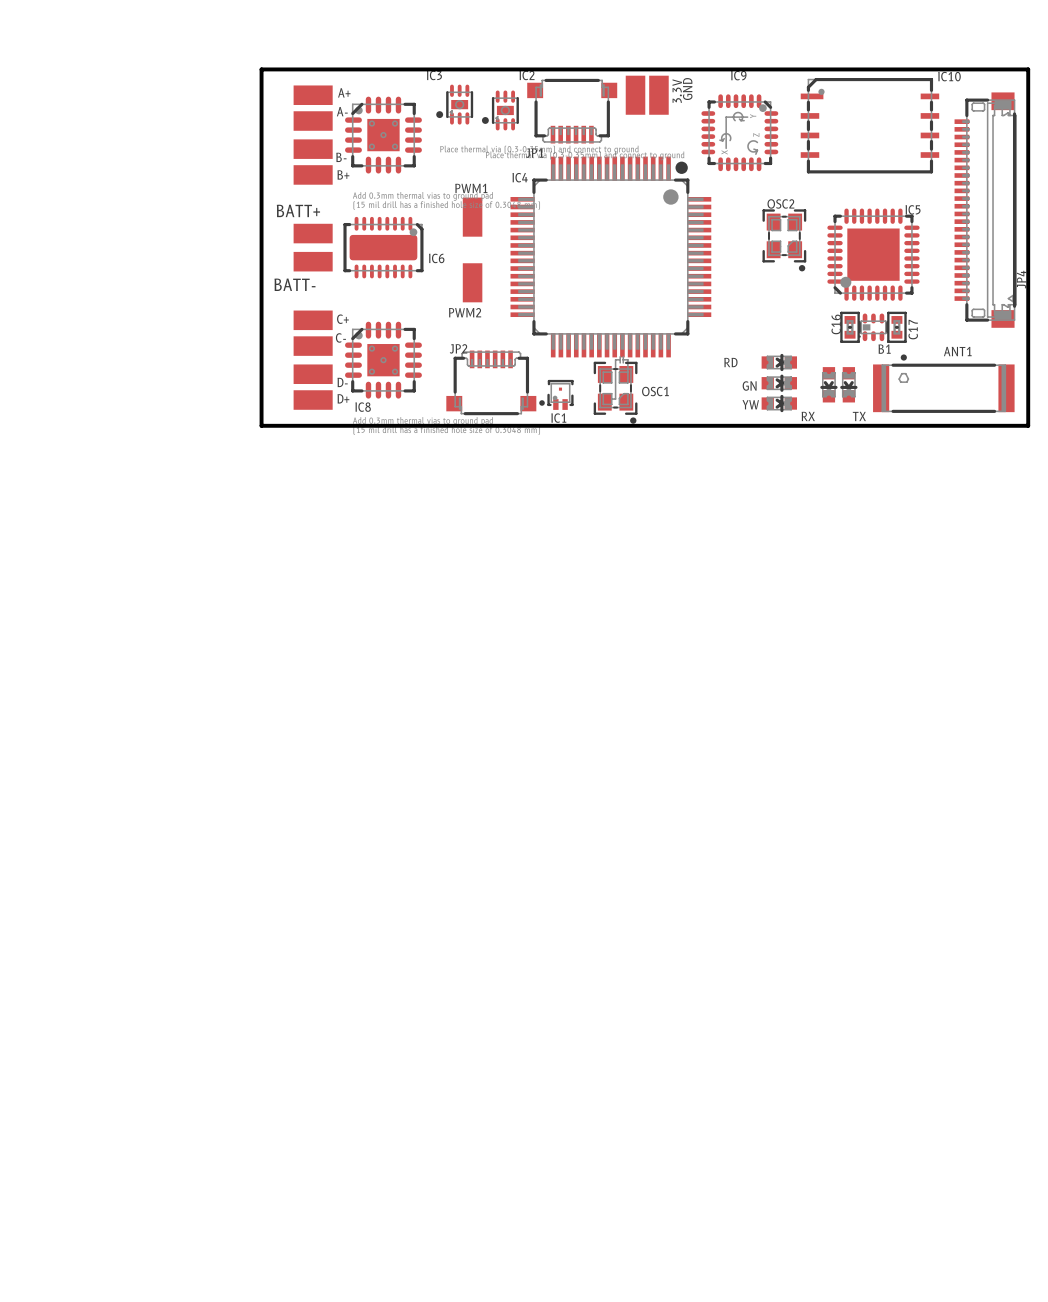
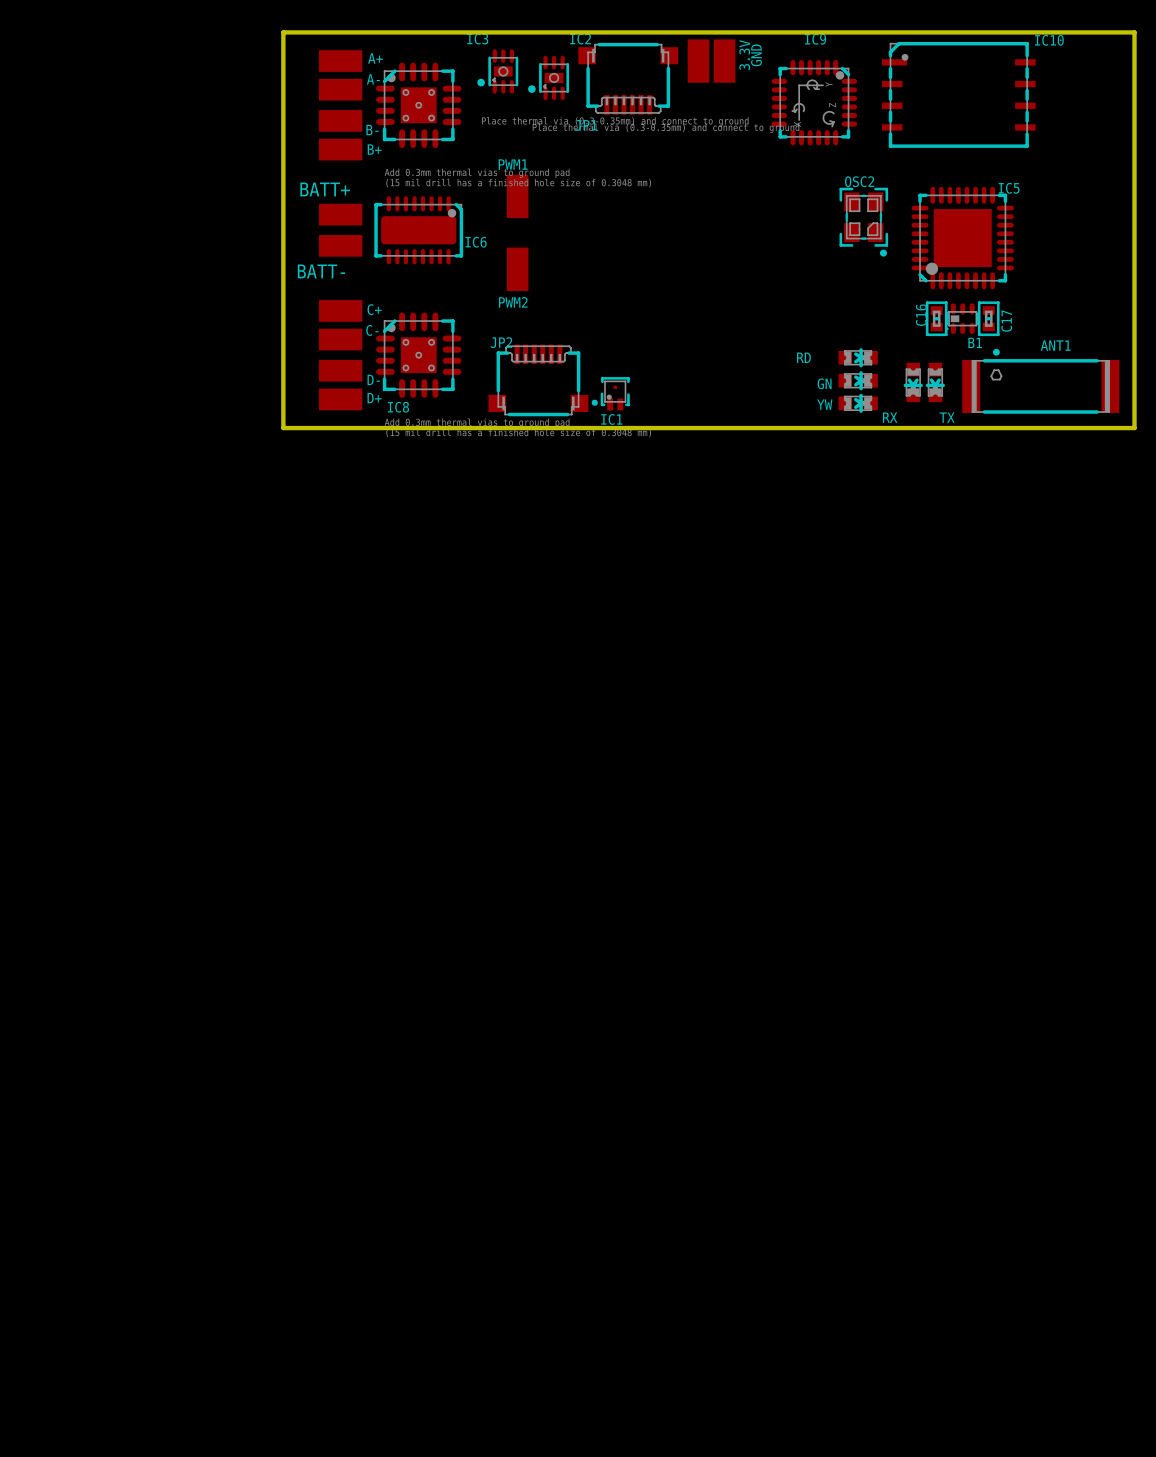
JP4: (985, 210) -> none
IC4: (610, 257) -> none
OSC1: (615, 390) -> none

